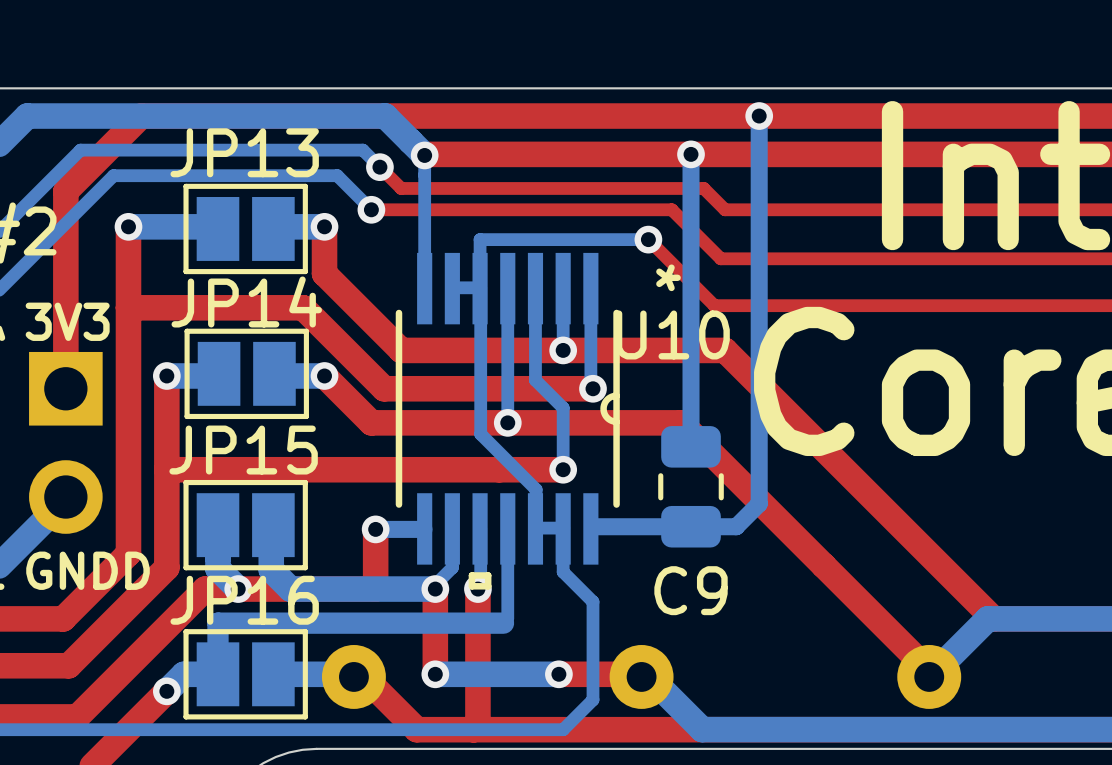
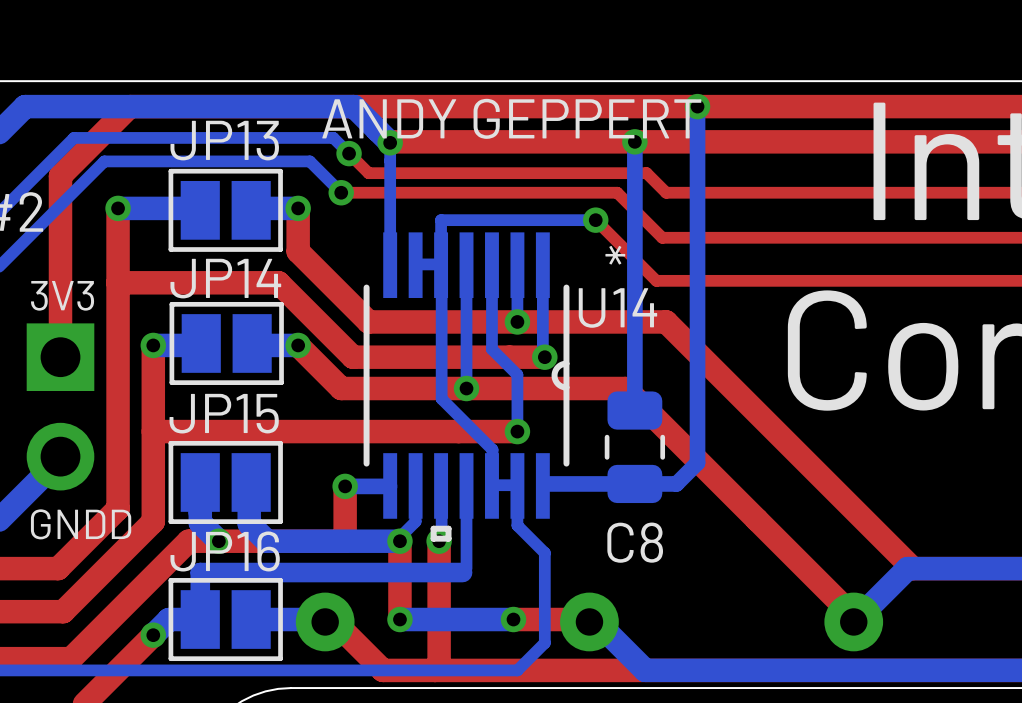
text: none -> ANDY GEPPERT (511, 118)
U10 name: U10 (672, 334) -> U14 (617, 307)
C9 name: C9 (691, 590) -> C8 (635, 542)

